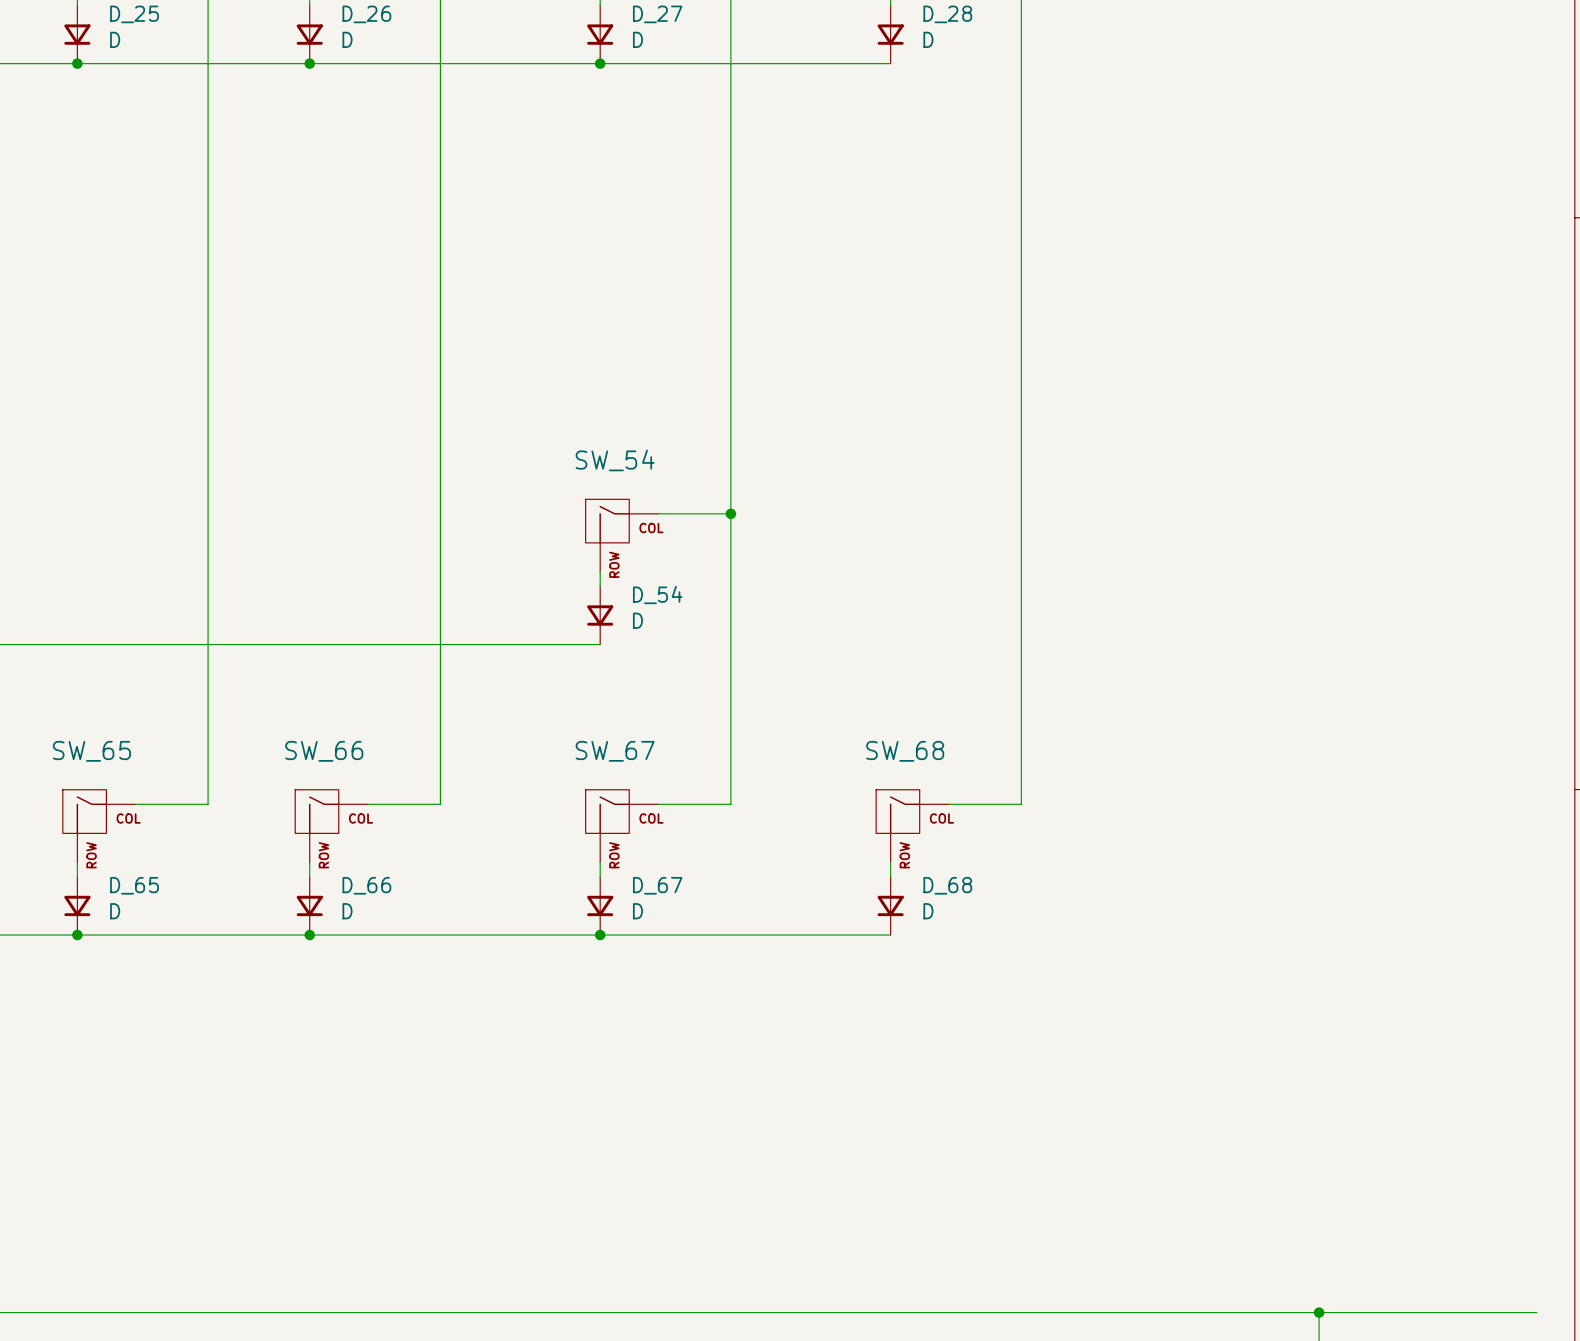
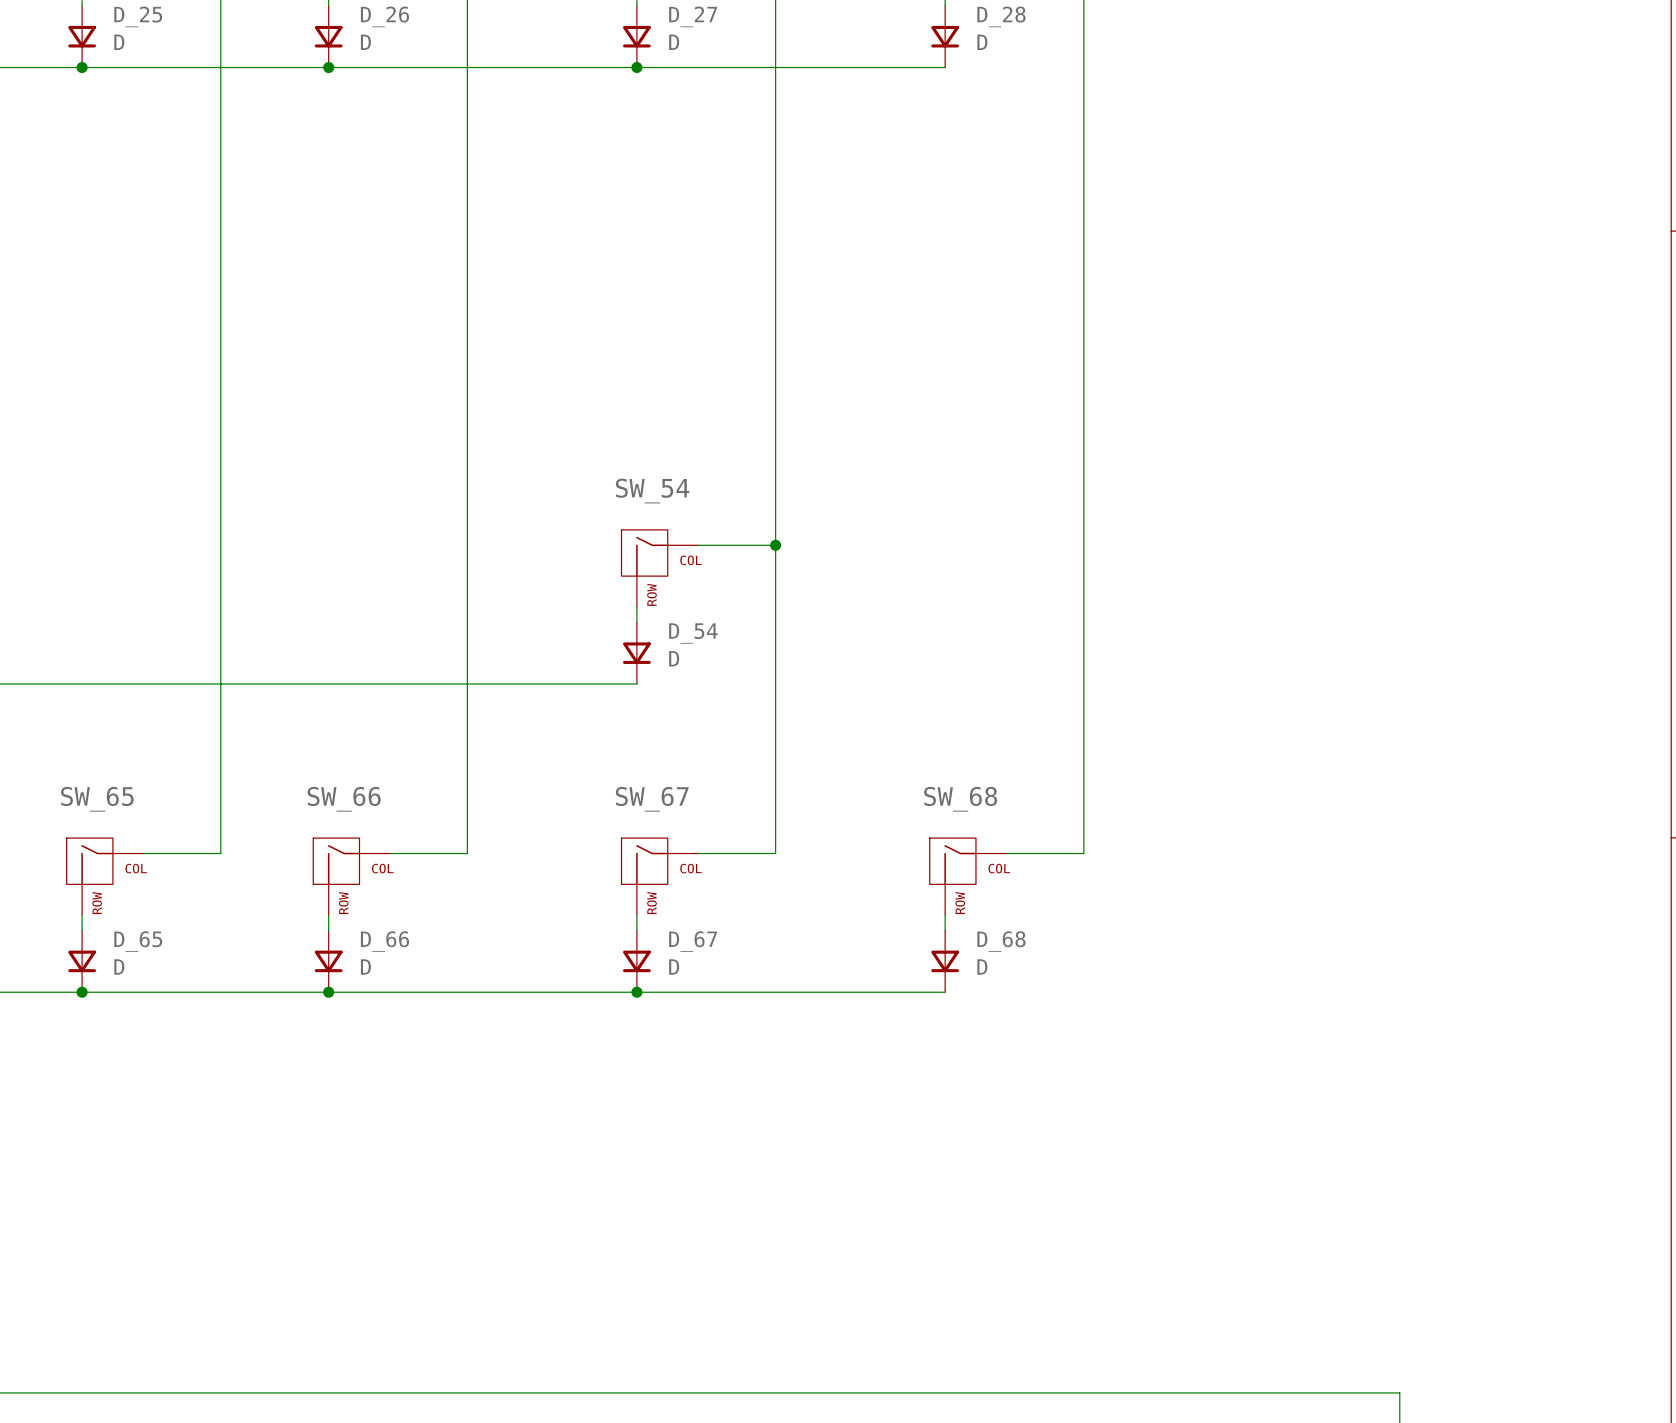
wire: (1319, 1312) (1536, 1312) -> none
junction: (1319, 1312) -> none

